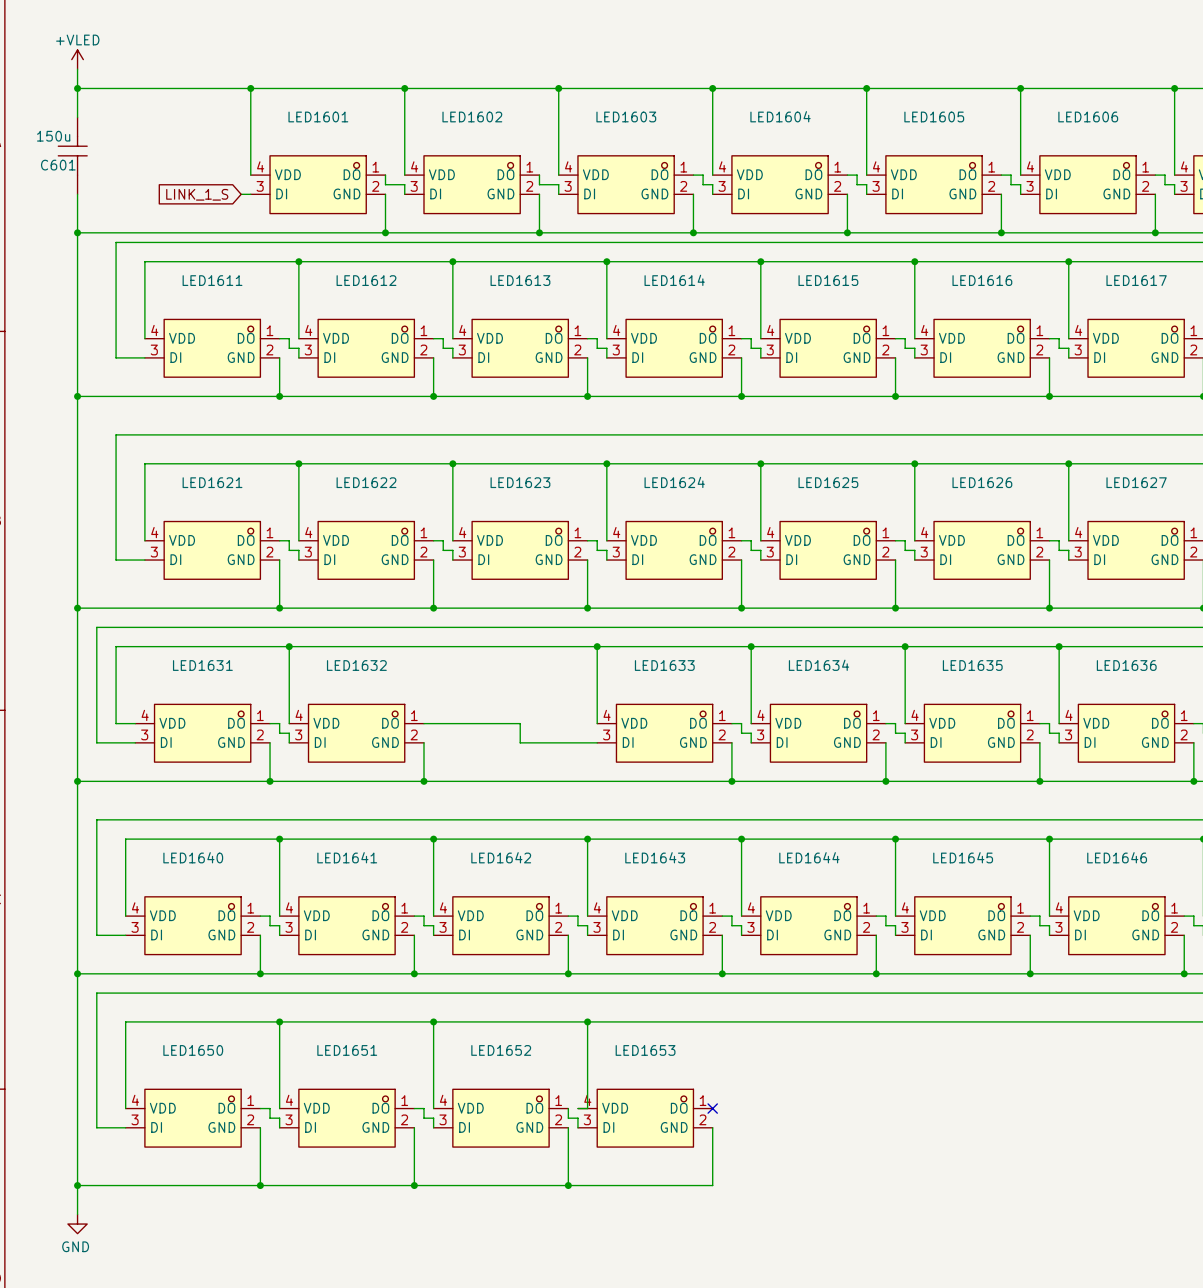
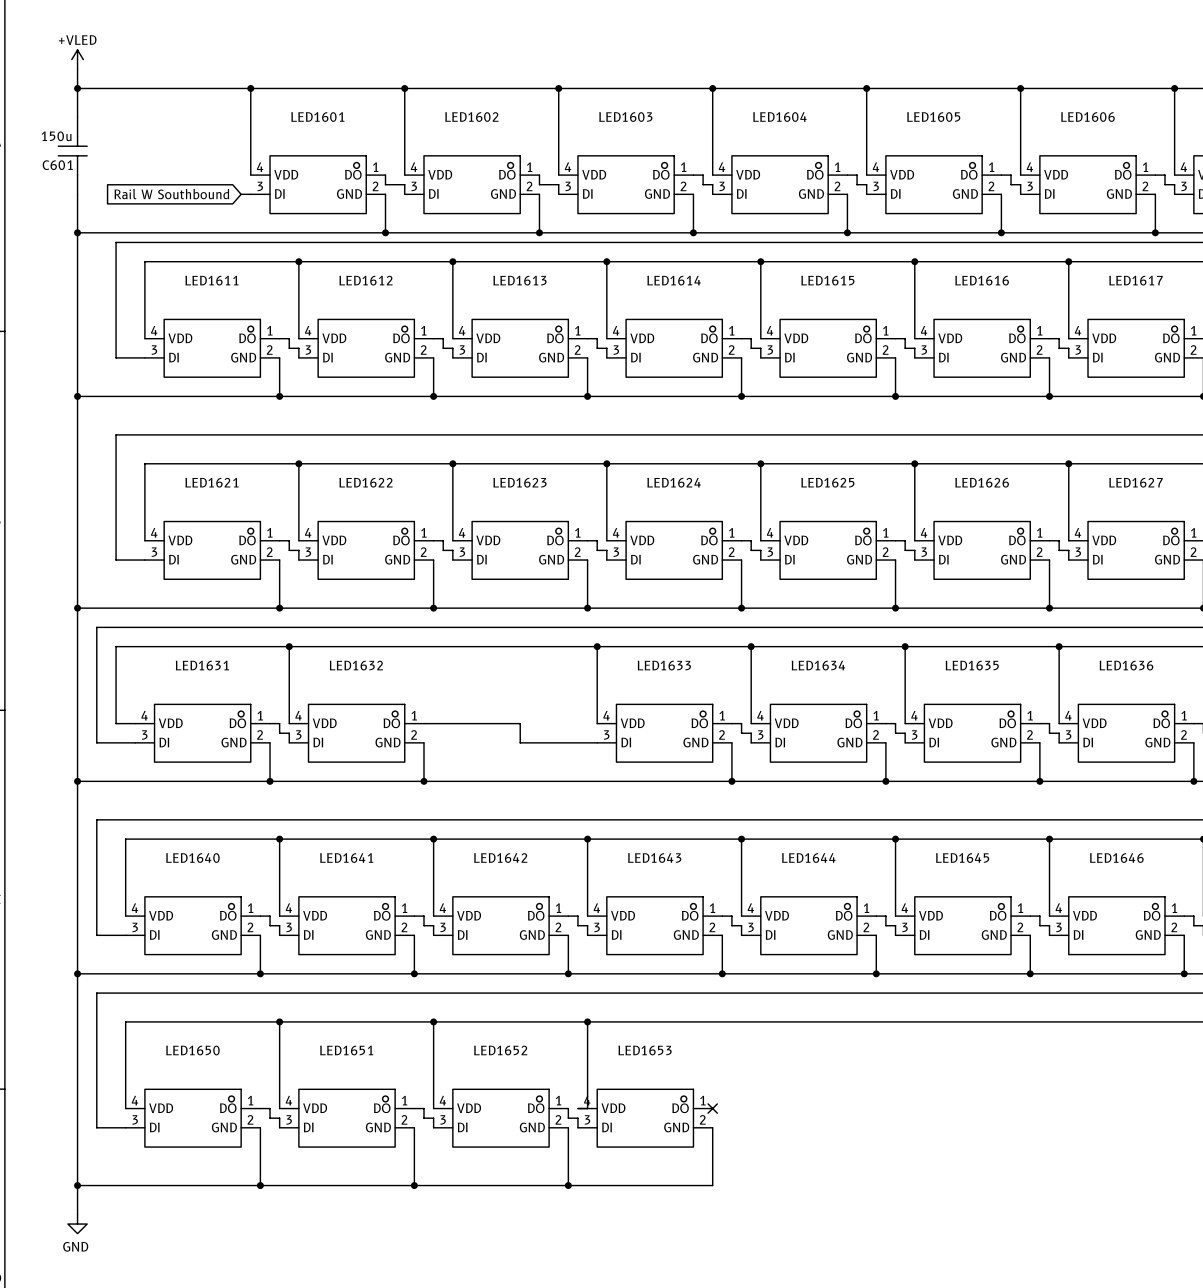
global label: LINK_1_S (197, 194) -> Rail W Southbound (171, 194)

